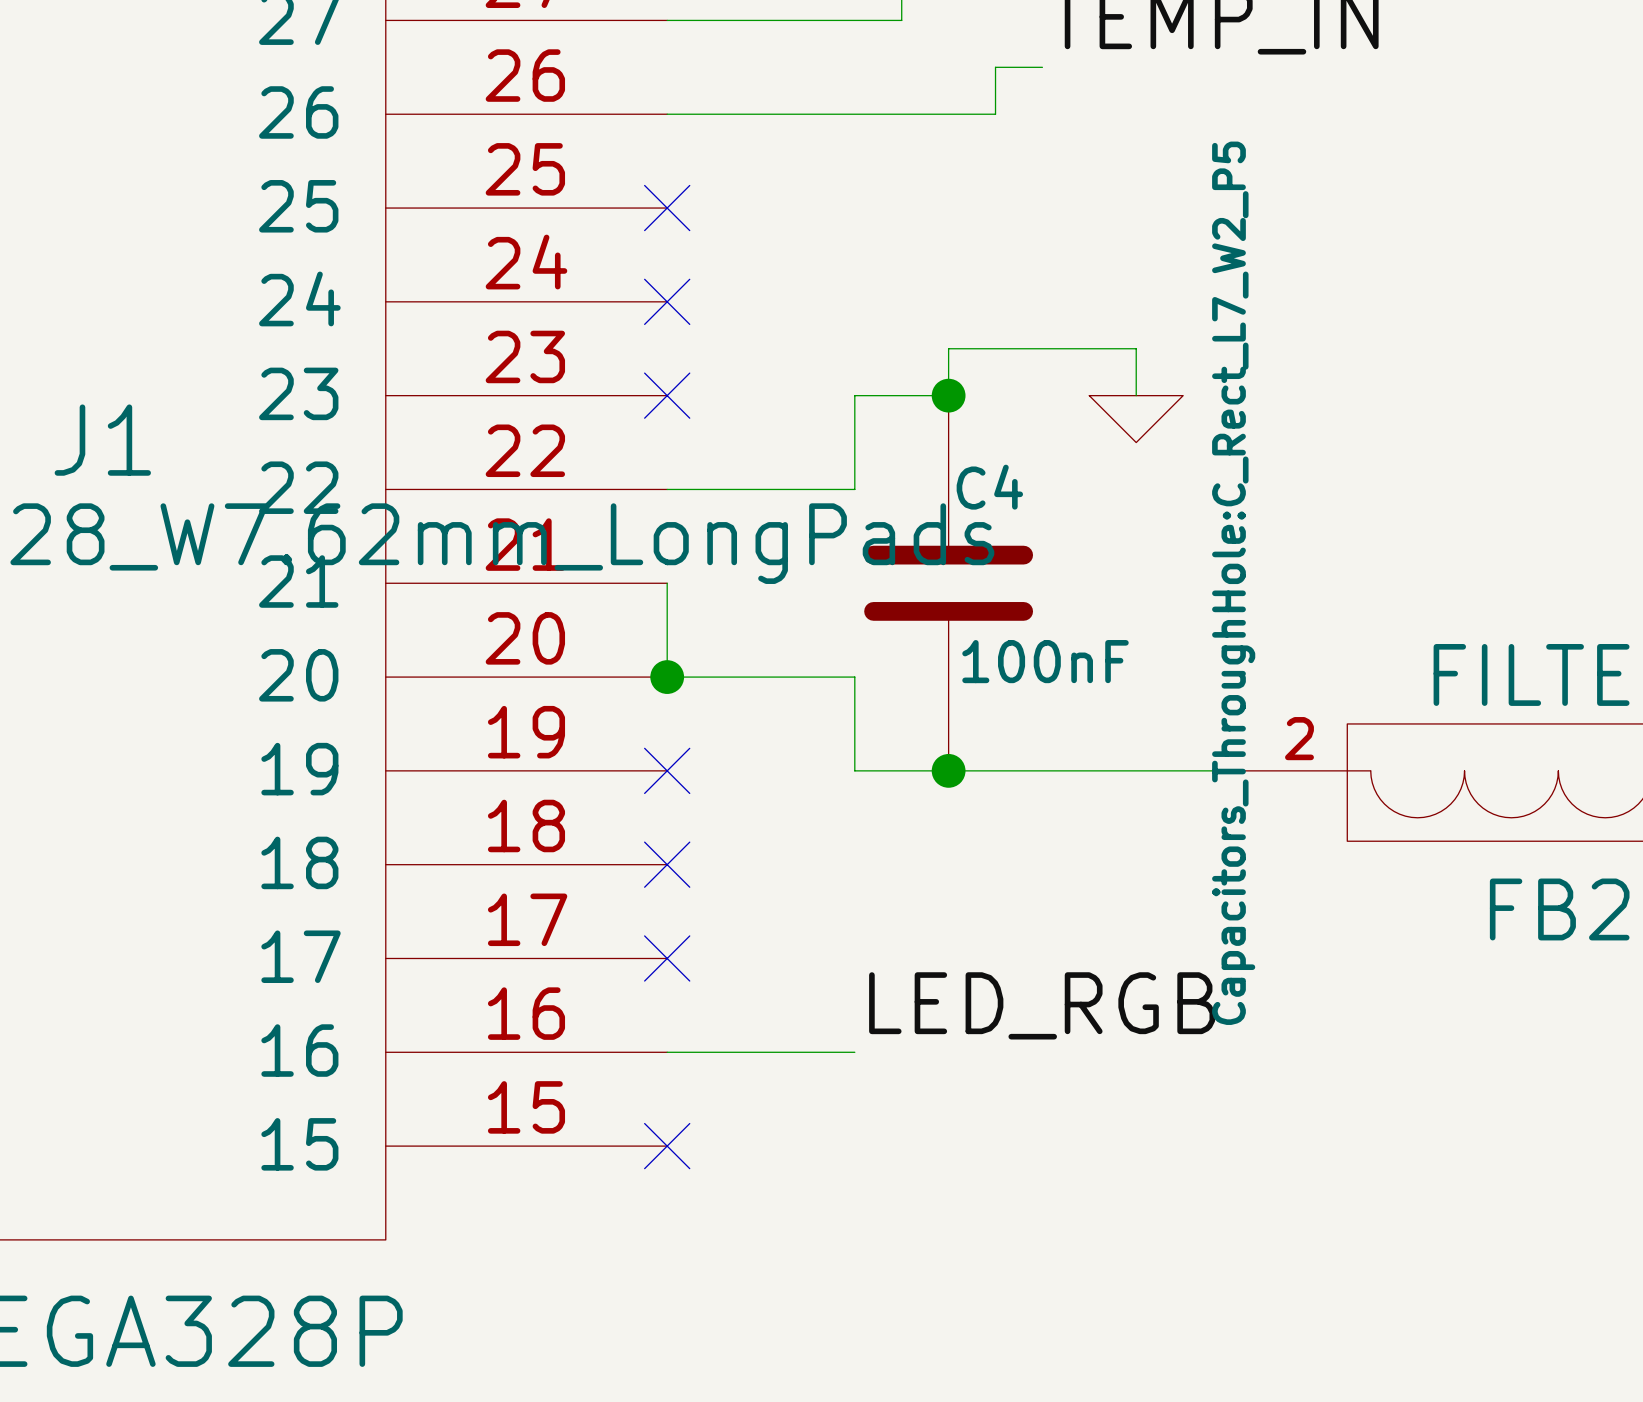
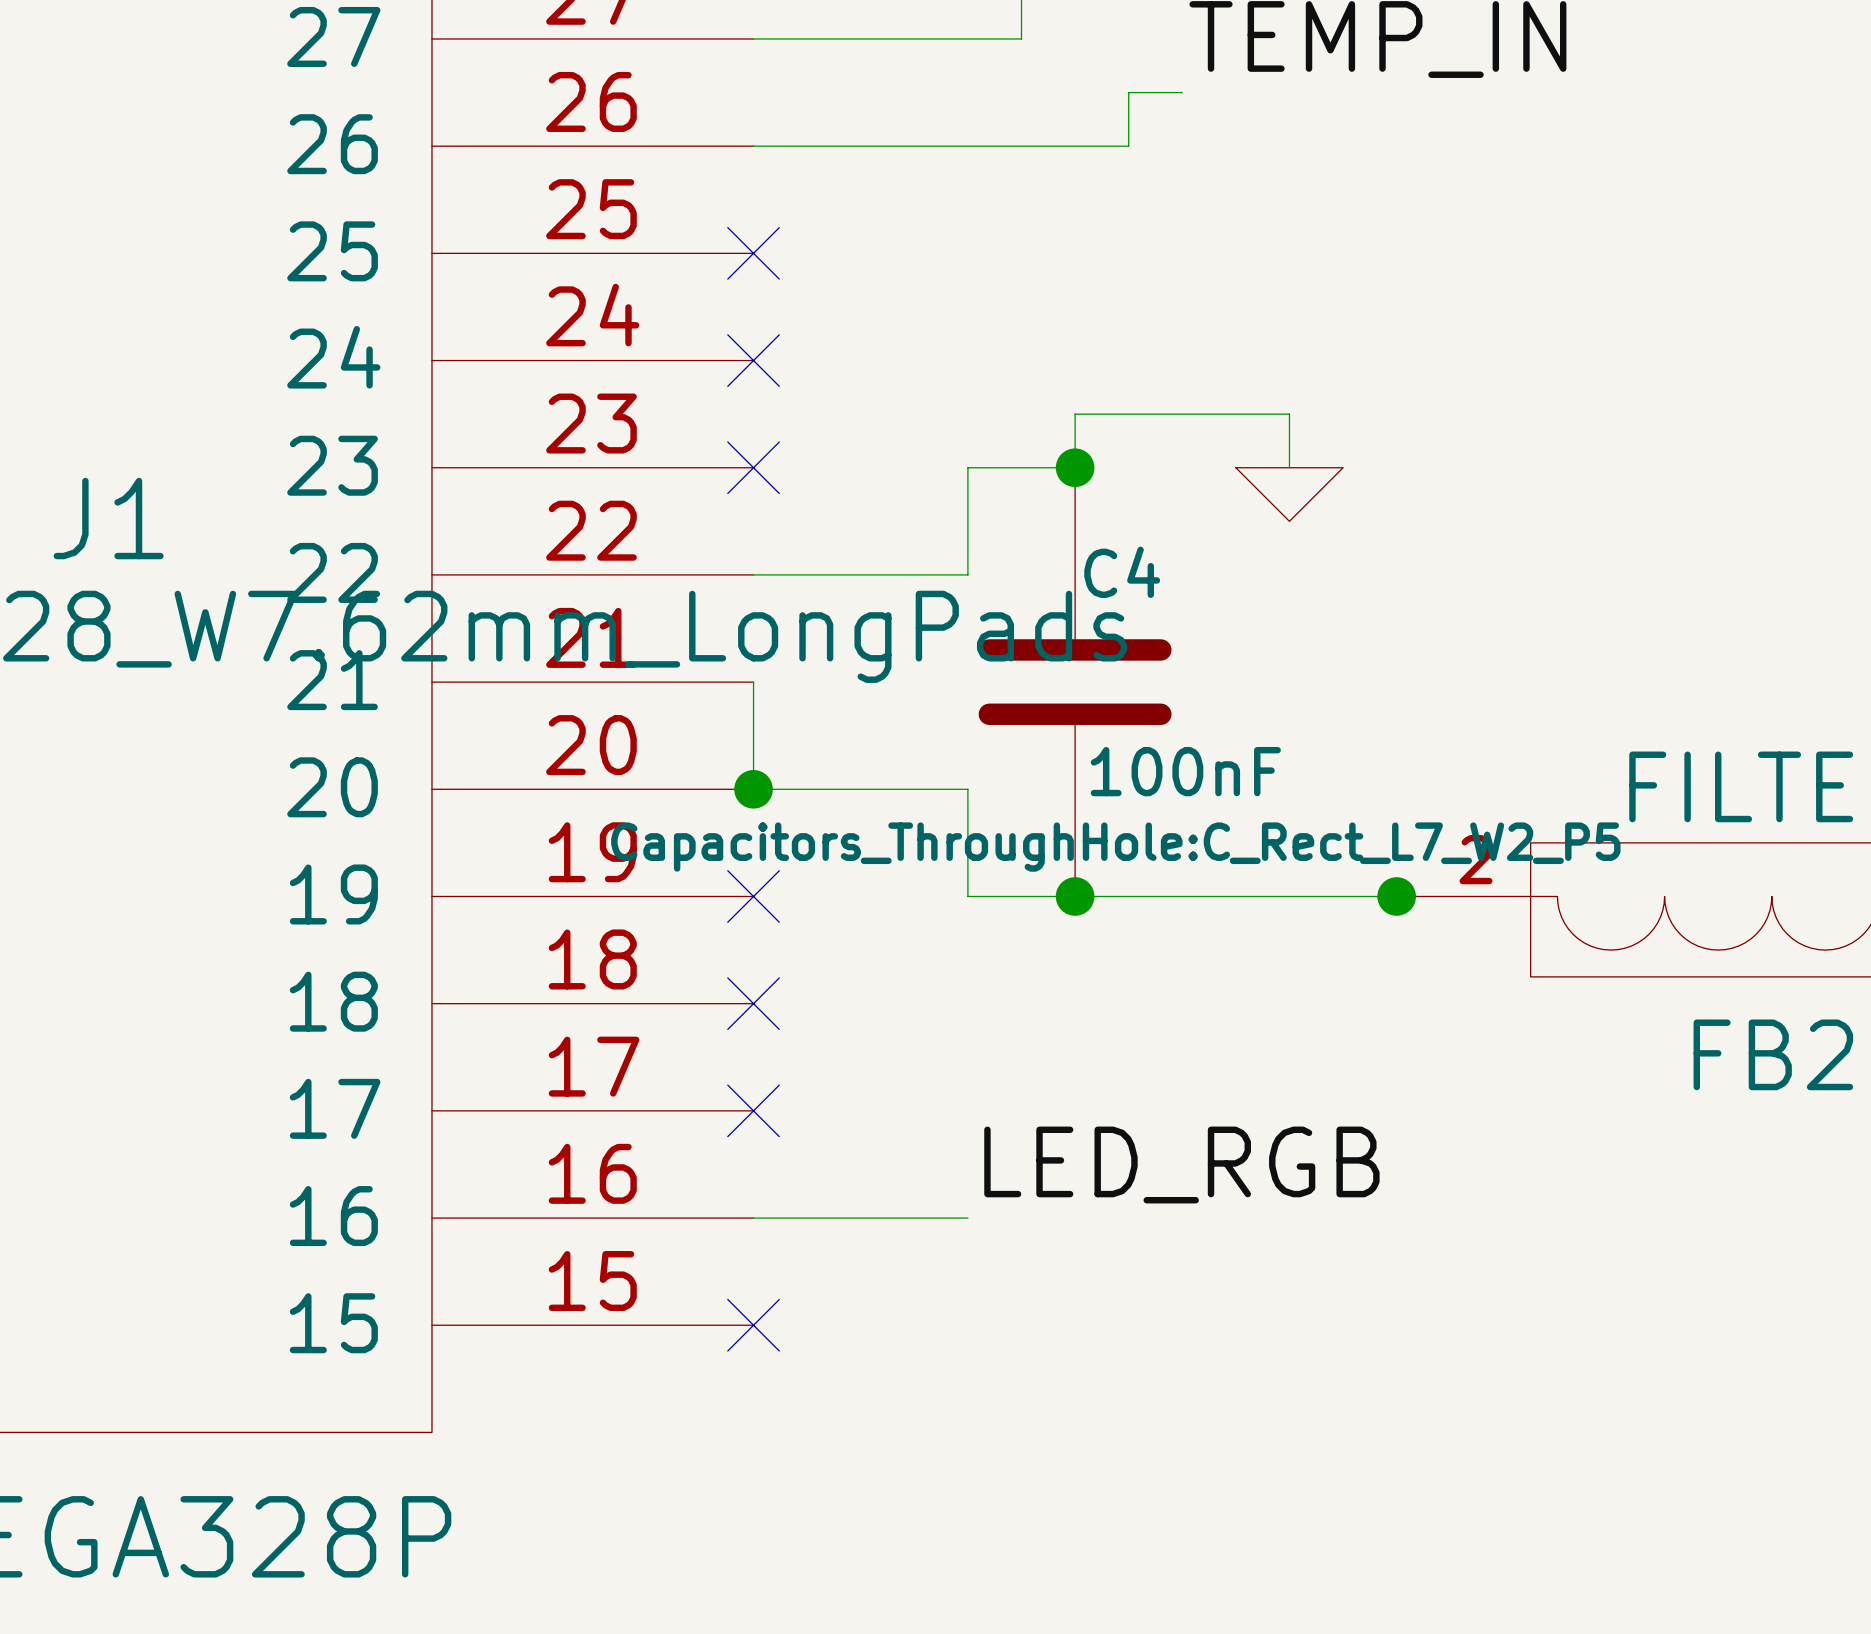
C4 text rotation: 0° (1233, 583) -> 90° clockwise (1115, 847)
junction: none -> (1396, 896)

